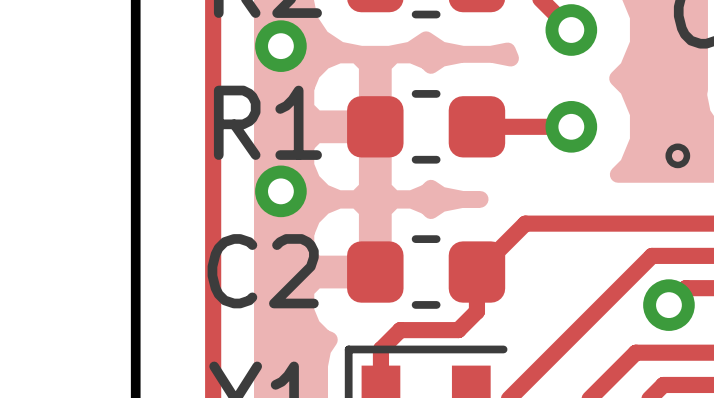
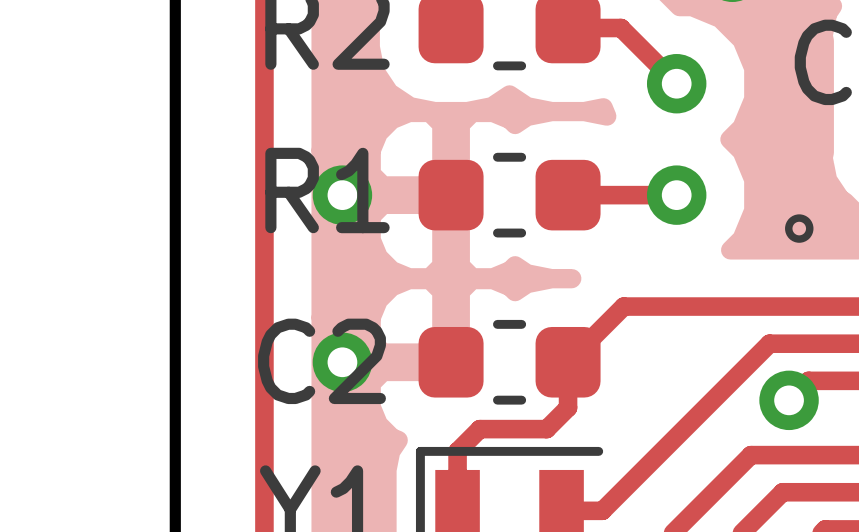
via: (280, 46) -> none
via: none -> (342, 195)
via: (280, 191) -> none
via: none -> (342, 362)

